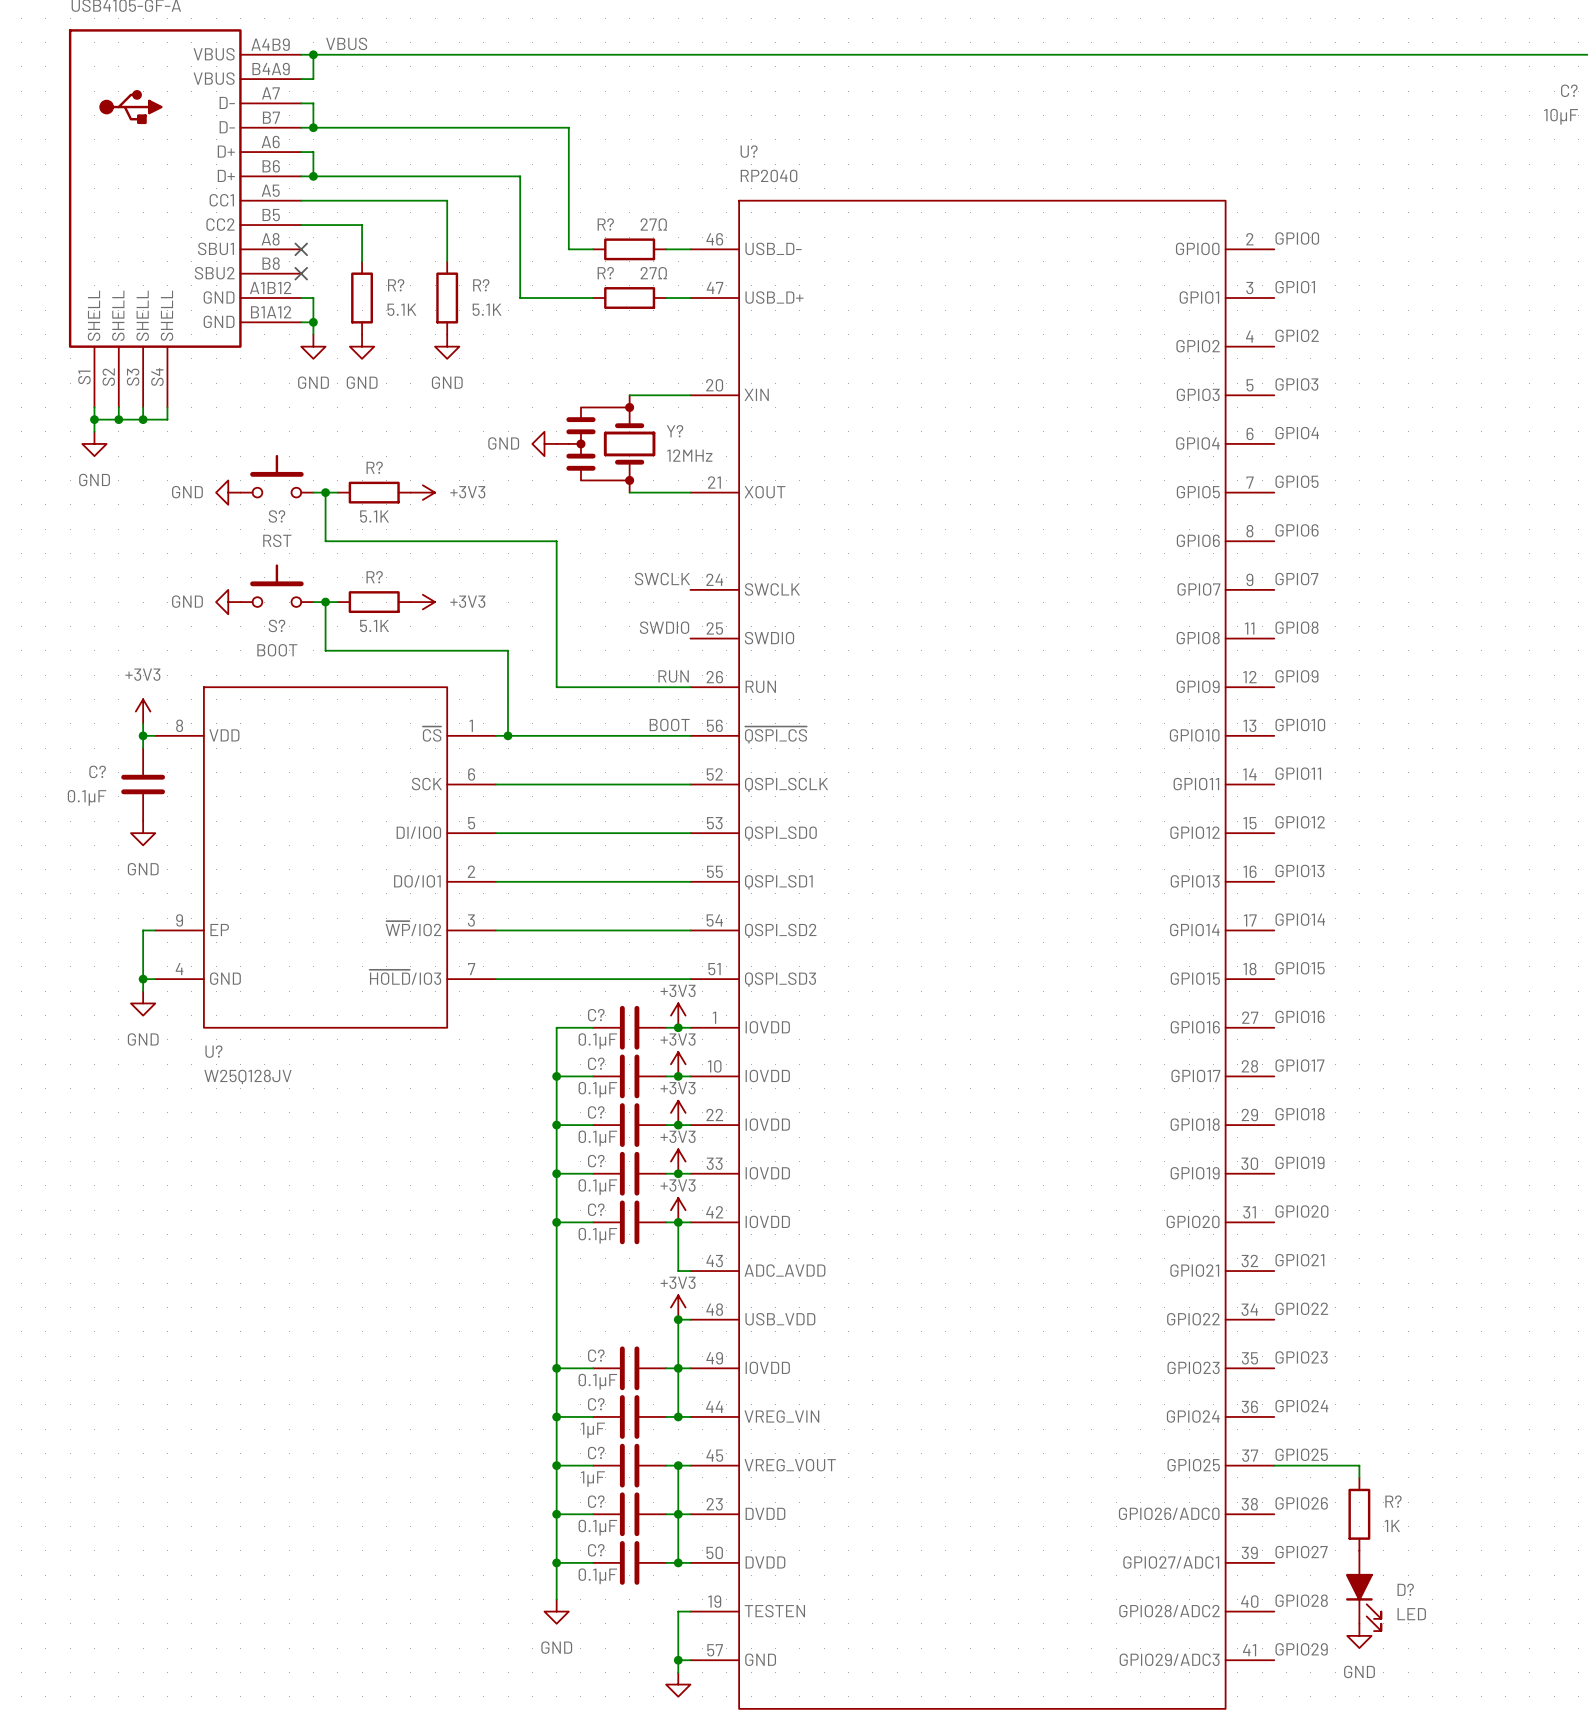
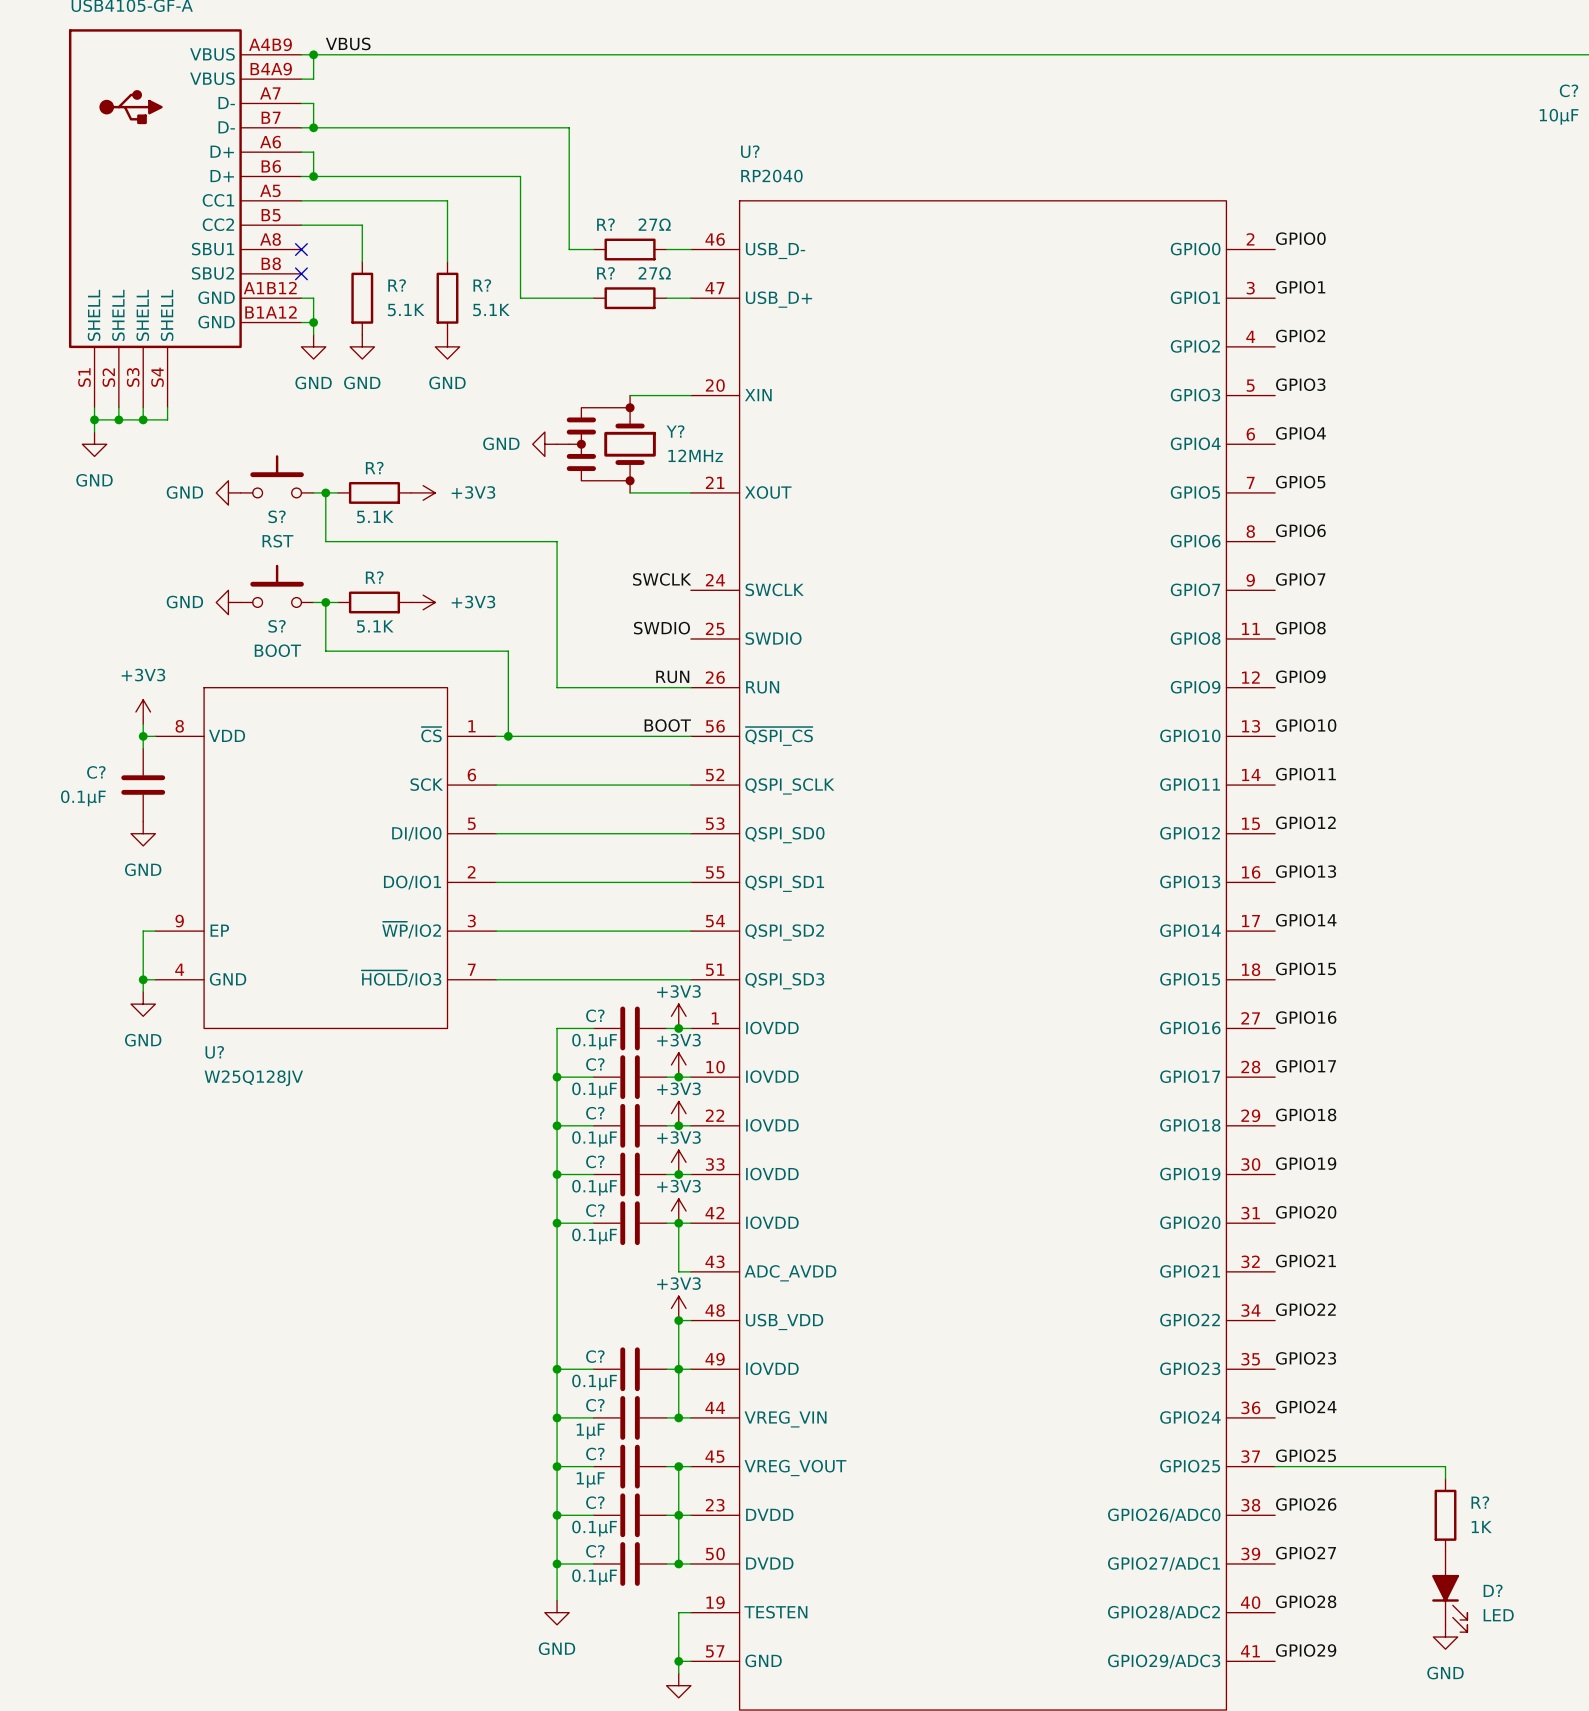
wire: (1359, 1465) (1359, 1477) -> (1360, 1466) (1445, 1466) (1445, 1478)
R? position: (1359, 1514) -> (1445, 1515)
D? position: (1363, 1590) -> (1449, 1591)
power symbol position: GND (1359, 1635) -> GND (1445, 1637)

